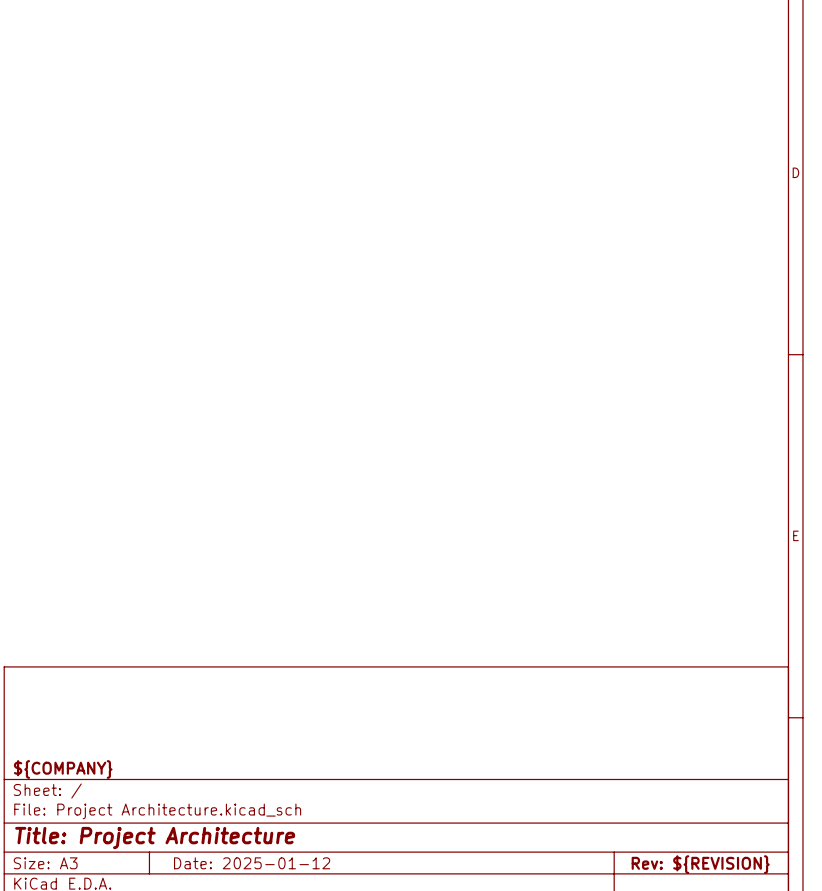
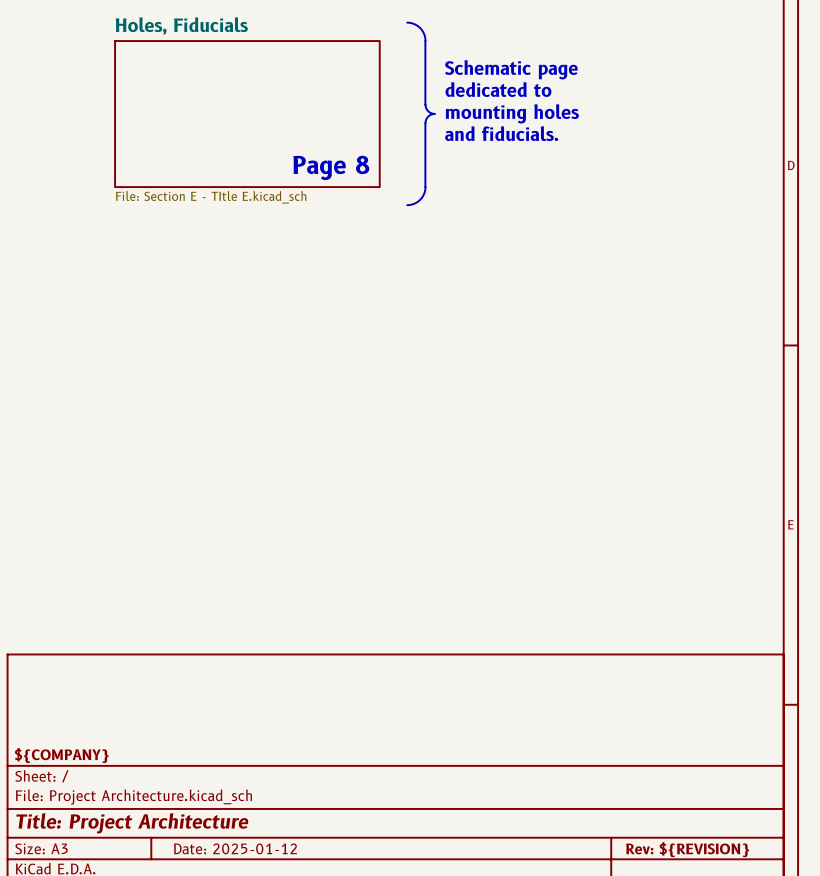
line: none -> (407, 22) (420, 28) (425, 40)
line: none -> (425, 41) (425, 104)
text: none -> Schematic page (511, 69)
text: none -> dedicated to (498, 89)
line: none -> (425, 104) (428, 111) (434, 113) (428, 116) (425, 123)
sheet Holes, Fiducials: none -> File: Section E - TItle E.kicad_sch (247, 114)
text: none -> mounting holes (512, 113)
line: none -> (425, 123) (425, 187)
text: none -> and fiducials. (501, 133)
text: none -> Page 8 (331, 167)
line: none -> (425, 186) (420, 199) (407, 205)

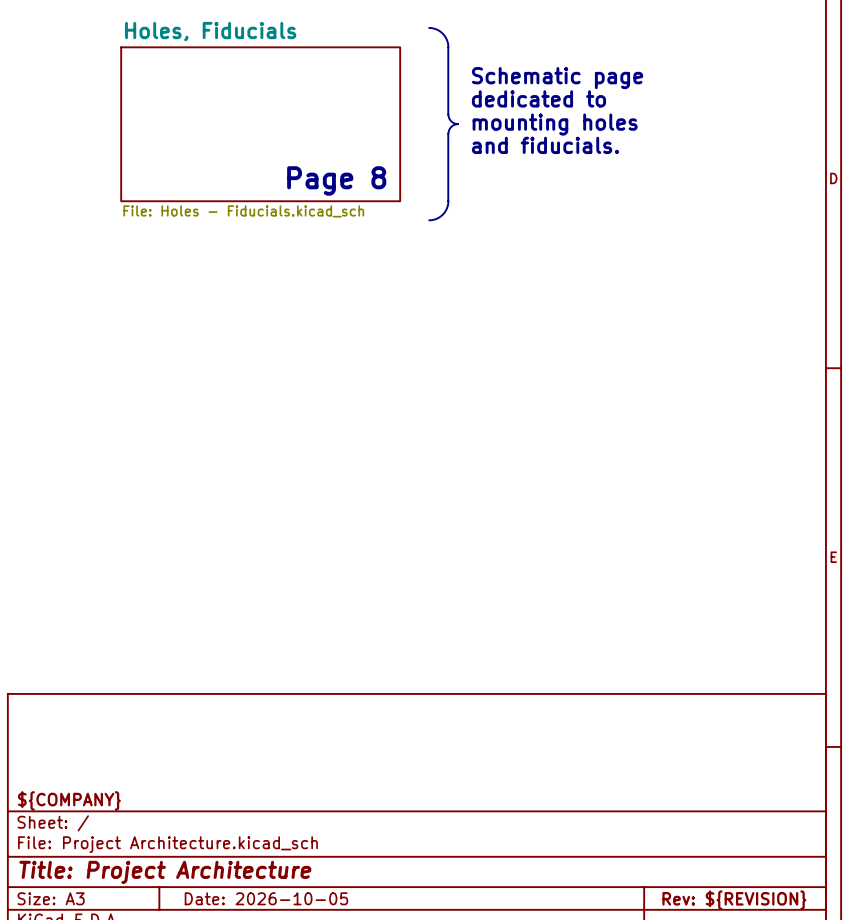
sheet Holes, Fiducials value: File: Section E - TItle E.kicad_sch (211, 197) -> File: Holes - Fiducials.kicad_sch (243, 211)
title block: Date: 2025-01-12 (235, 848) -> Date: 2026-10-05 (266, 898)

